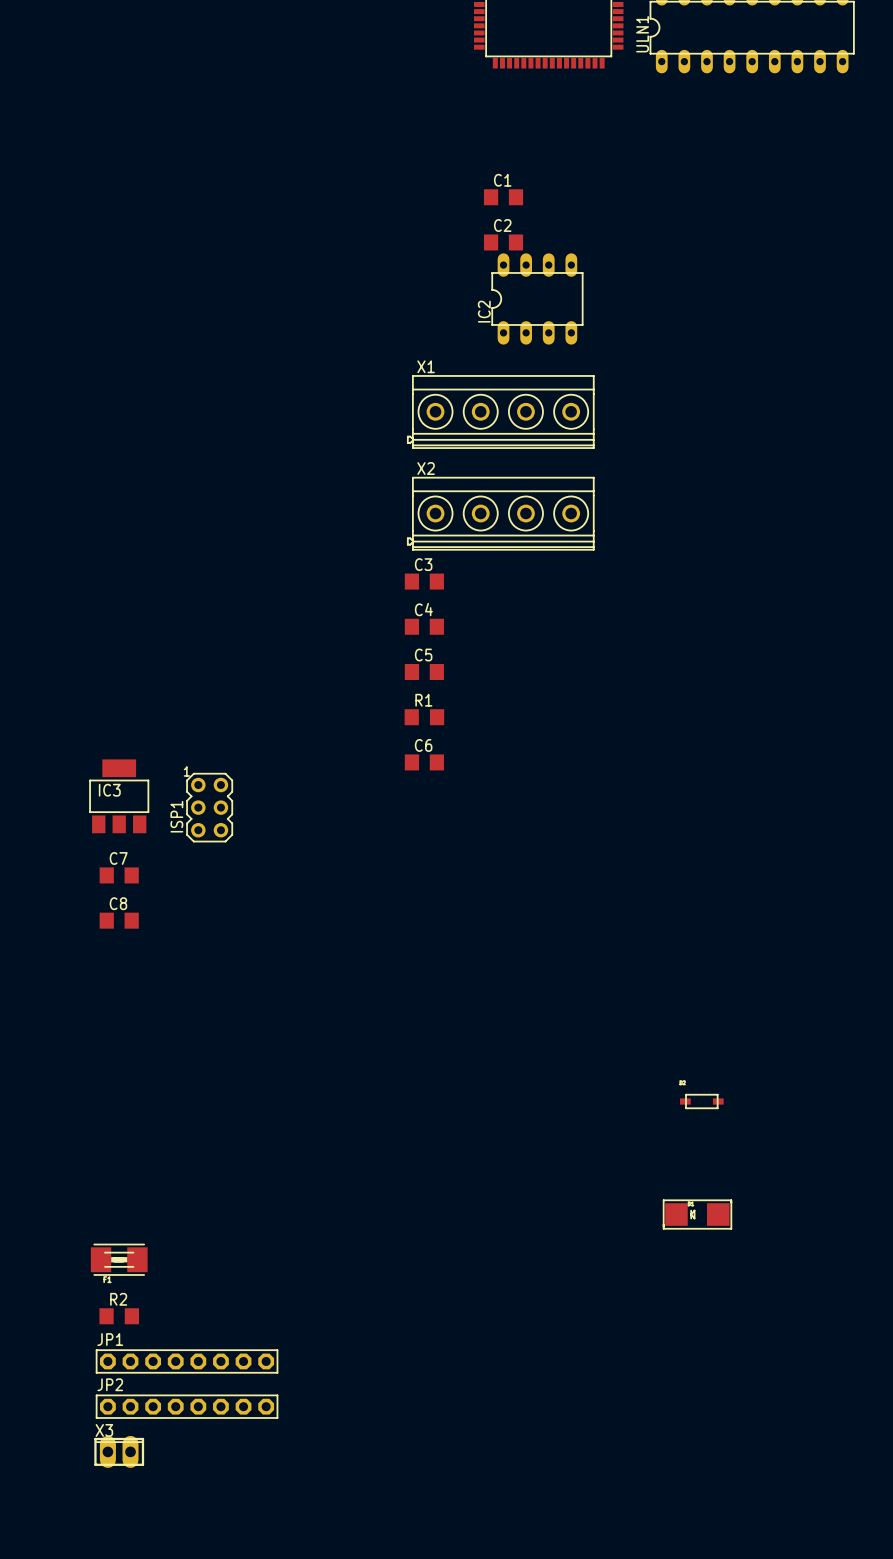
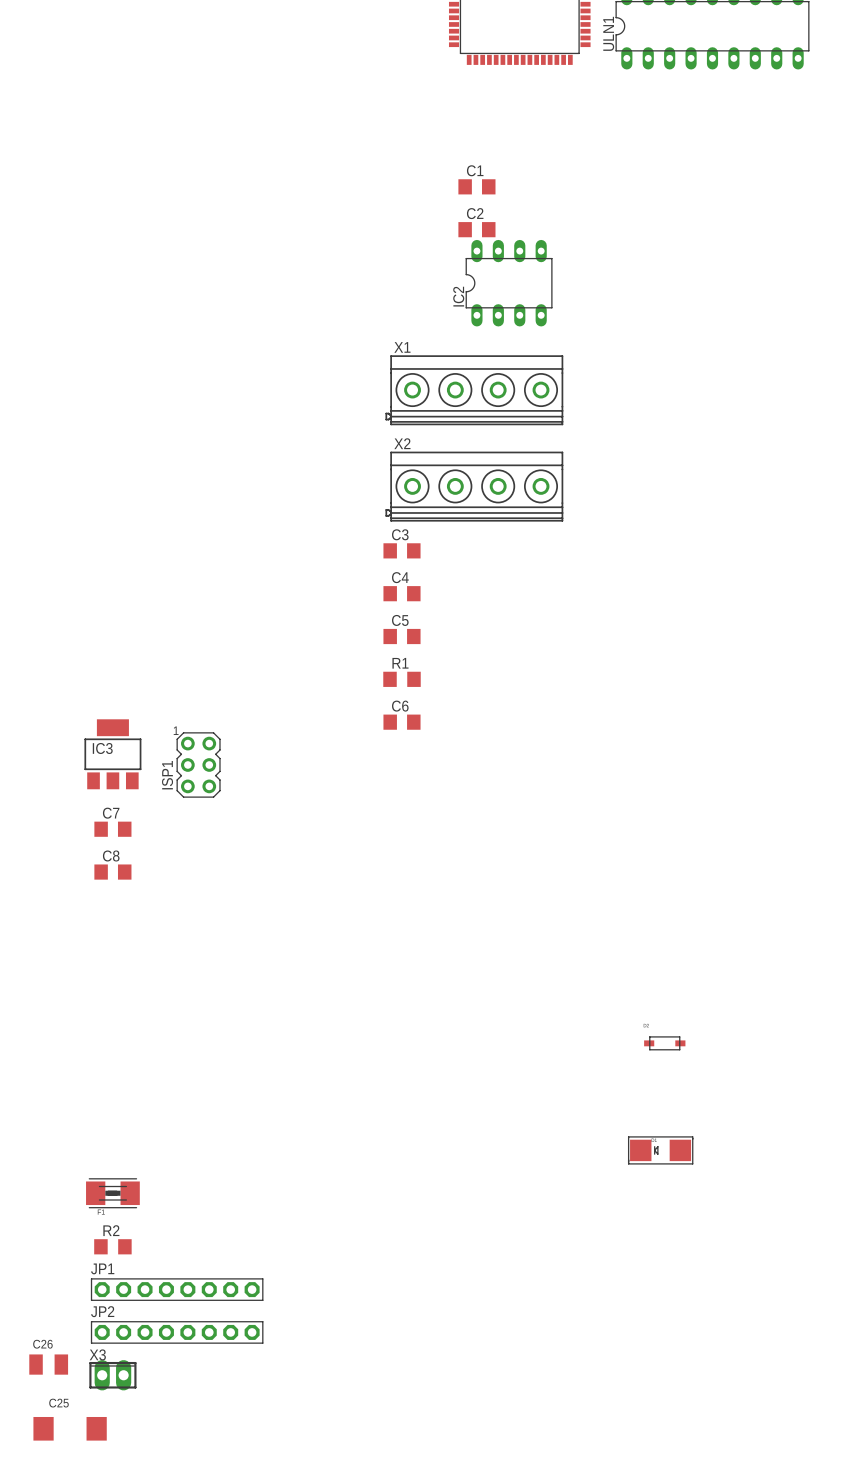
C26: none -> (48, 1364)
C25: none -> (70, 1428)

